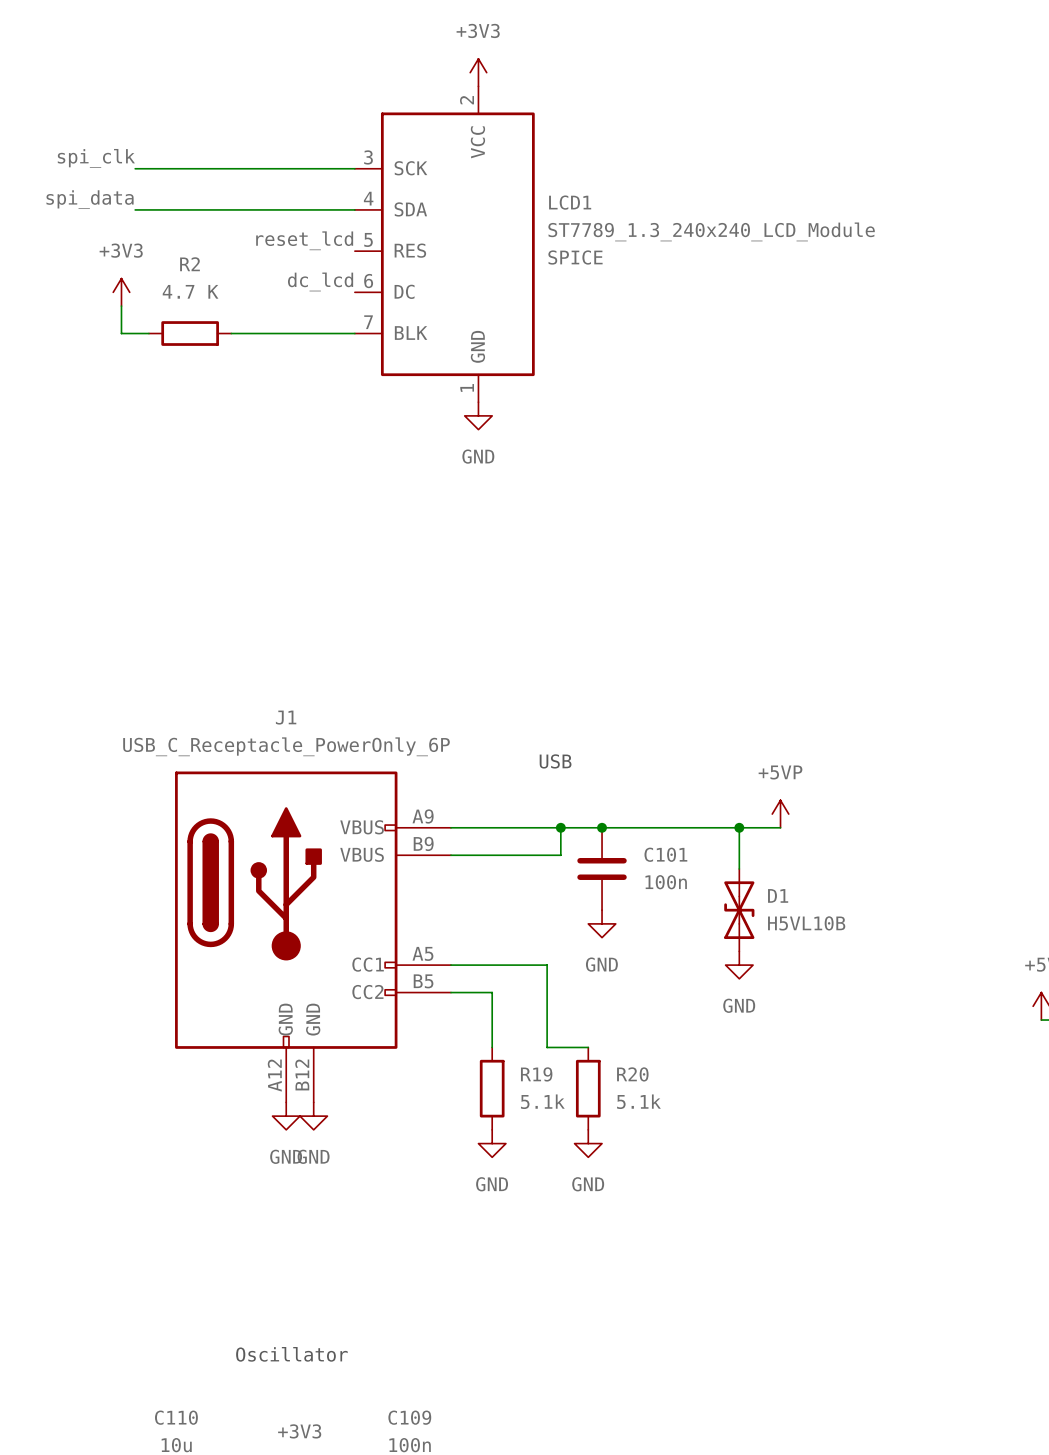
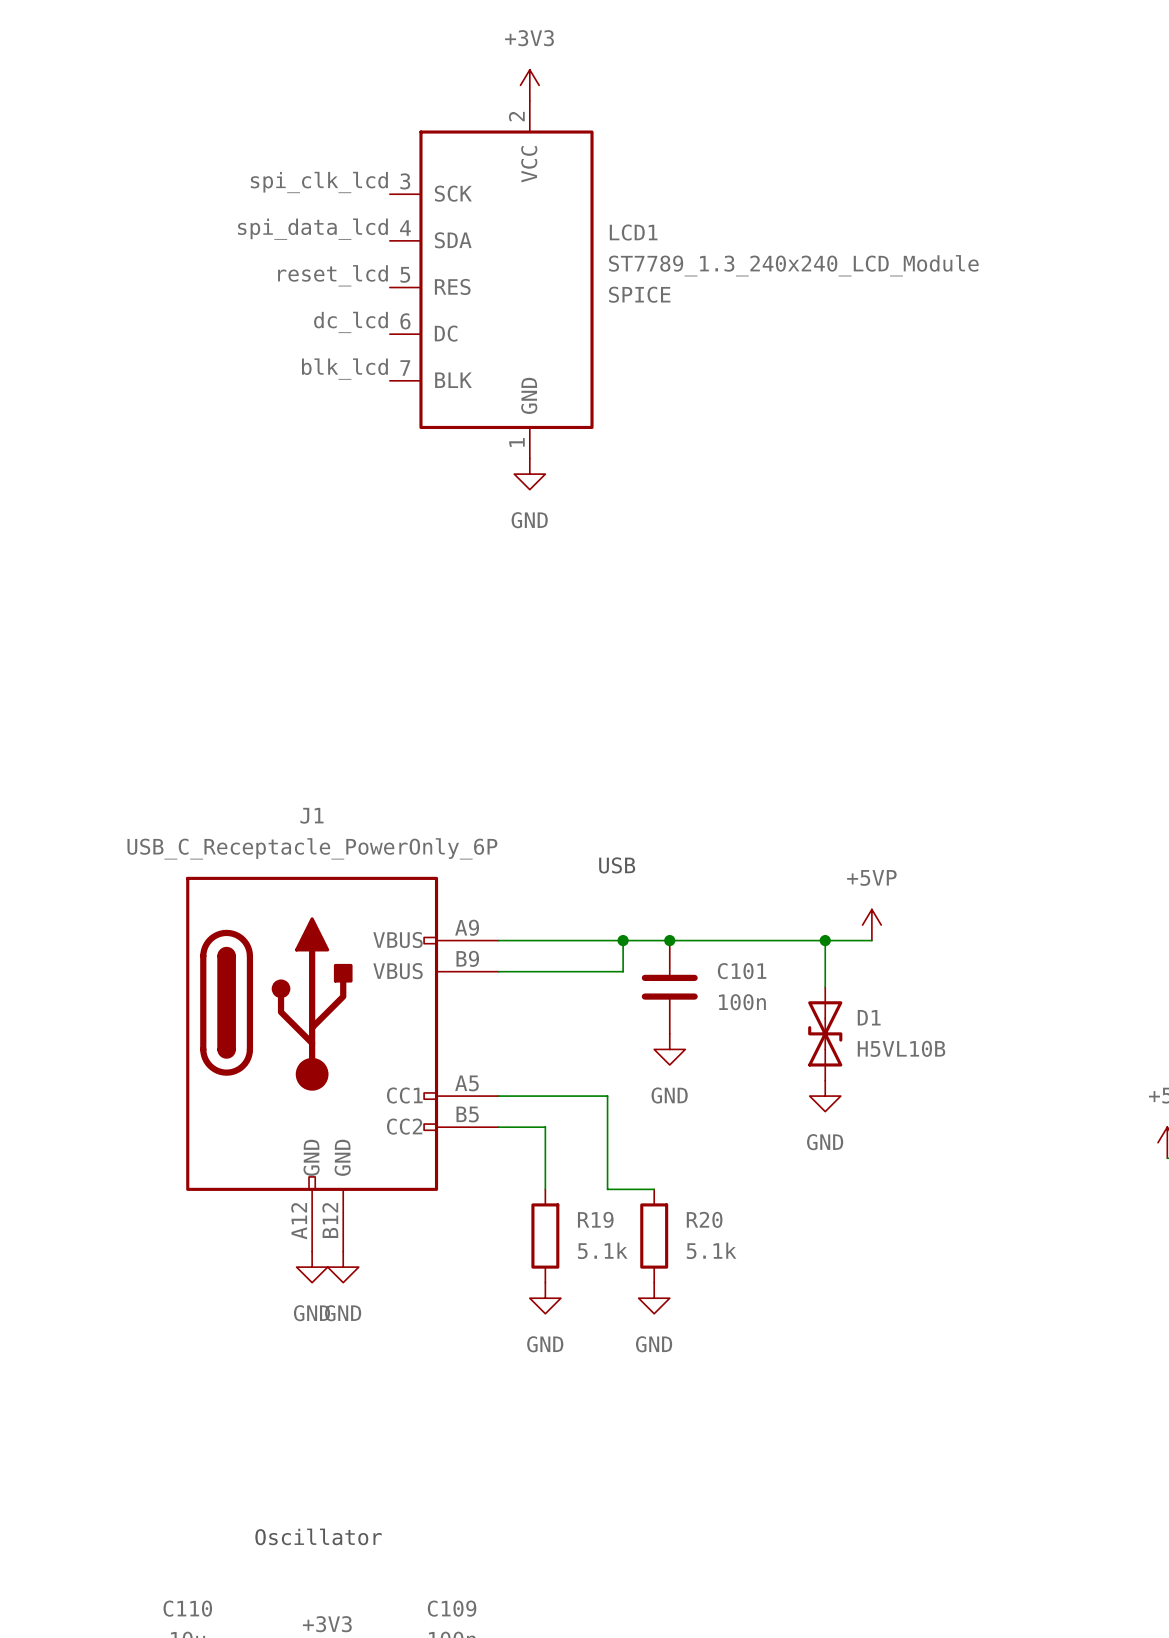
label: spi_clk (96, 158) -> none
label: none -> spi_clk_lcd (319, 182)
wire: (135, 168) (354, 168) -> none
label: spi_data (90, 199) -> none
label: none -> spi_data_lcd (312, 229)
wire: (135, 209) (354, 209) -> none
power symbol: +3V3 (121, 292) -> none
wire: (121, 306) (121, 333) (148, 333) -> none
label: none -> blk_lcd (344, 369)
R2: 4.7 K (190, 333) -> none
wire: (231, 333) (354, 333) -> none

